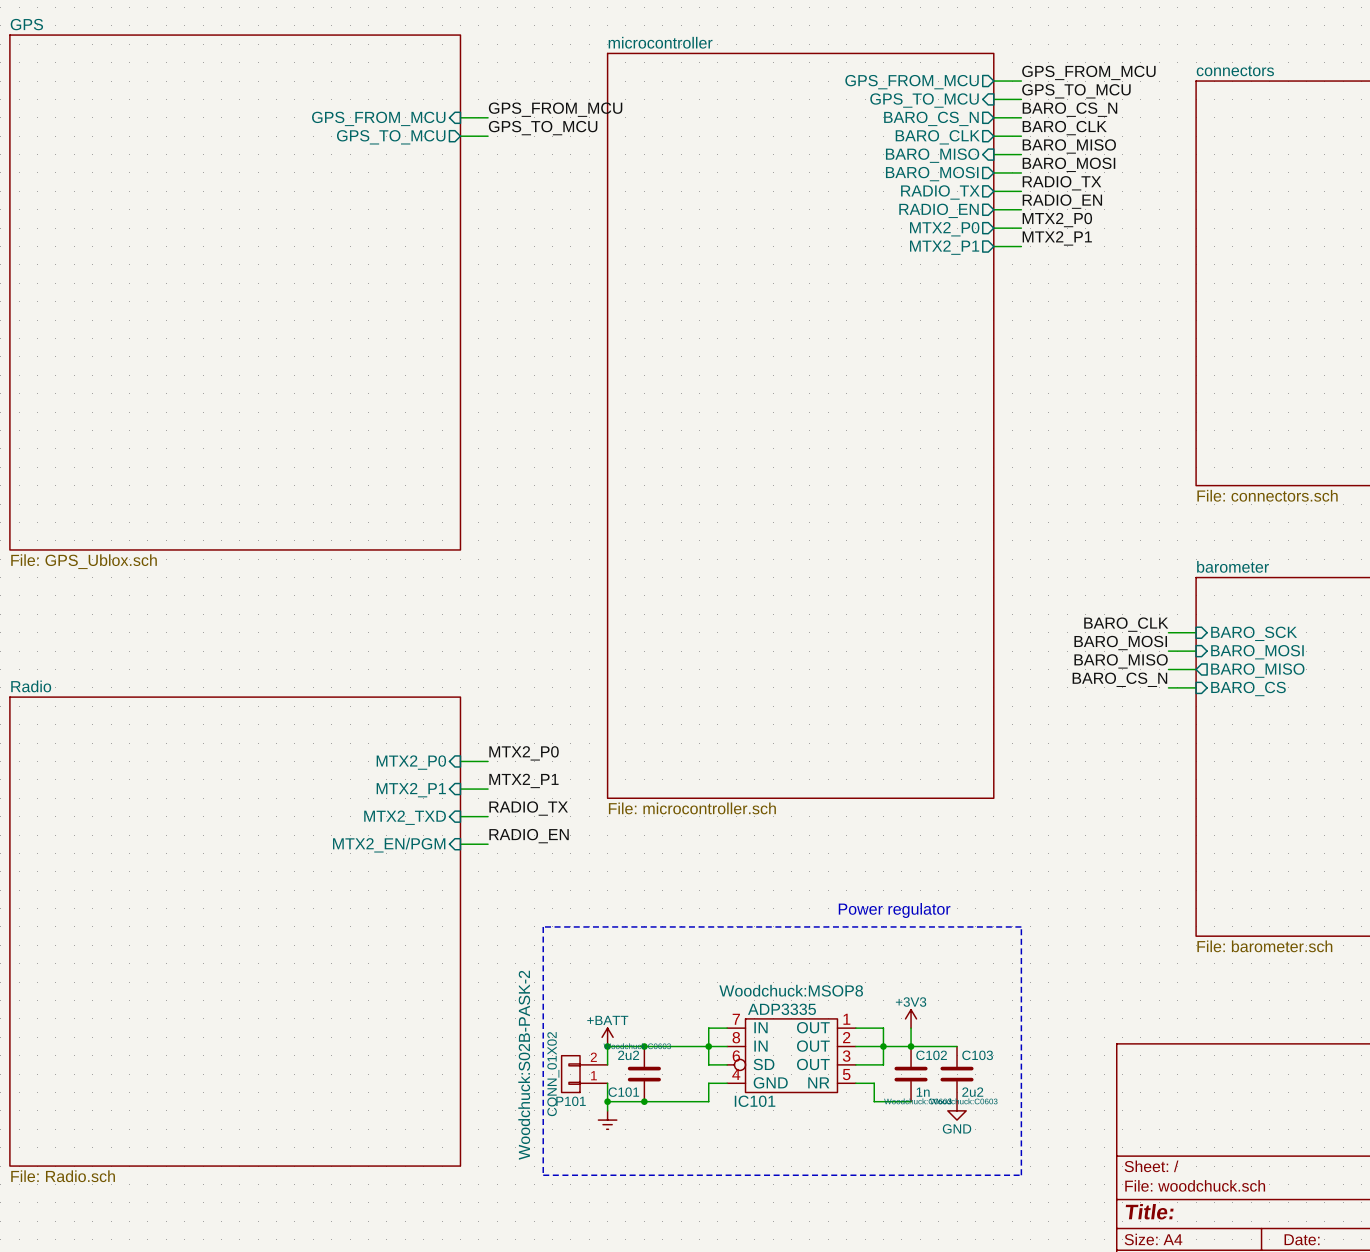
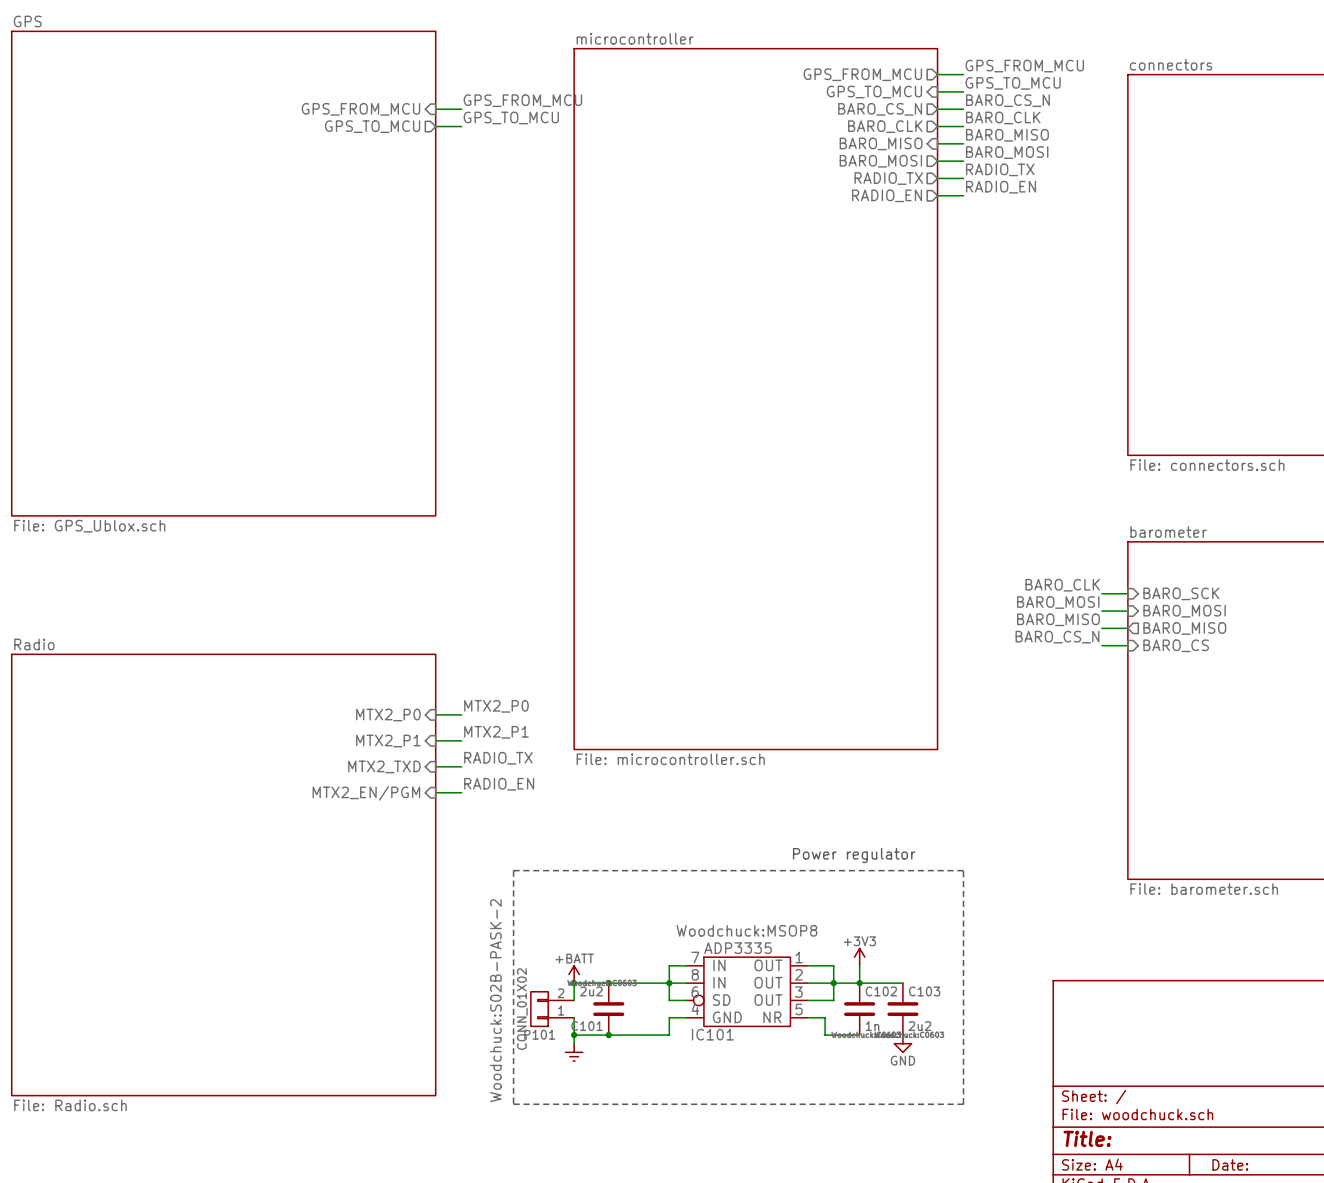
label: MTX2_P0 (1057, 220) -> none
wire: (993, 228) (1021, 228) -> none
sheet pin: MTX2_P0 (944, 229) -> none
label: MTX2_P1 (1057, 238) -> none
wire: (993, 246) (1021, 246) -> none
sheet pin: MTX2_P1 (944, 247) -> none

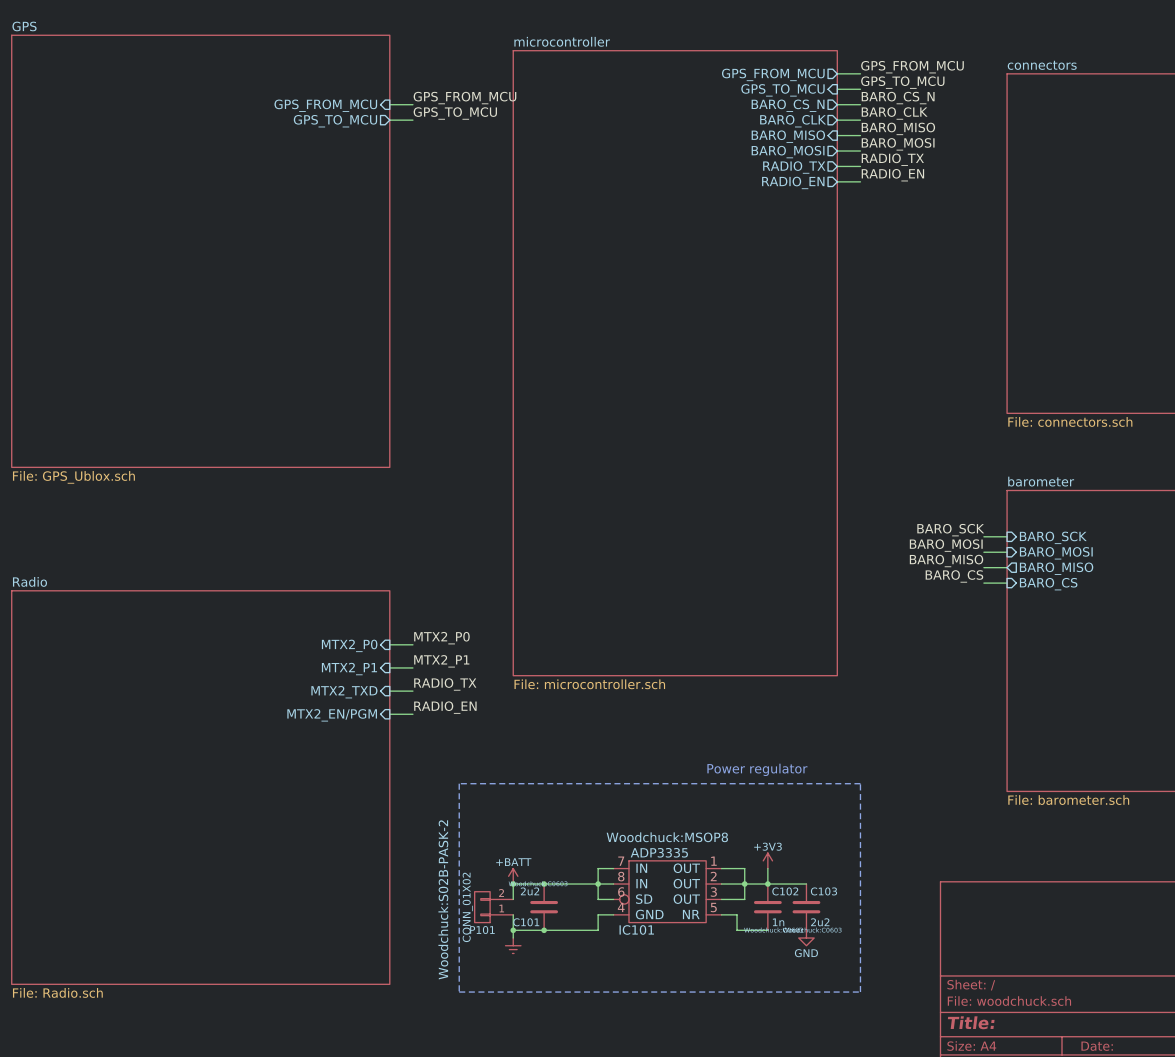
label: BARO_CLK (1062, 585) -> BARO_SCK (950, 530)
label: BARO_CS_N (1057, 637) -> BARO_CS (954, 576)

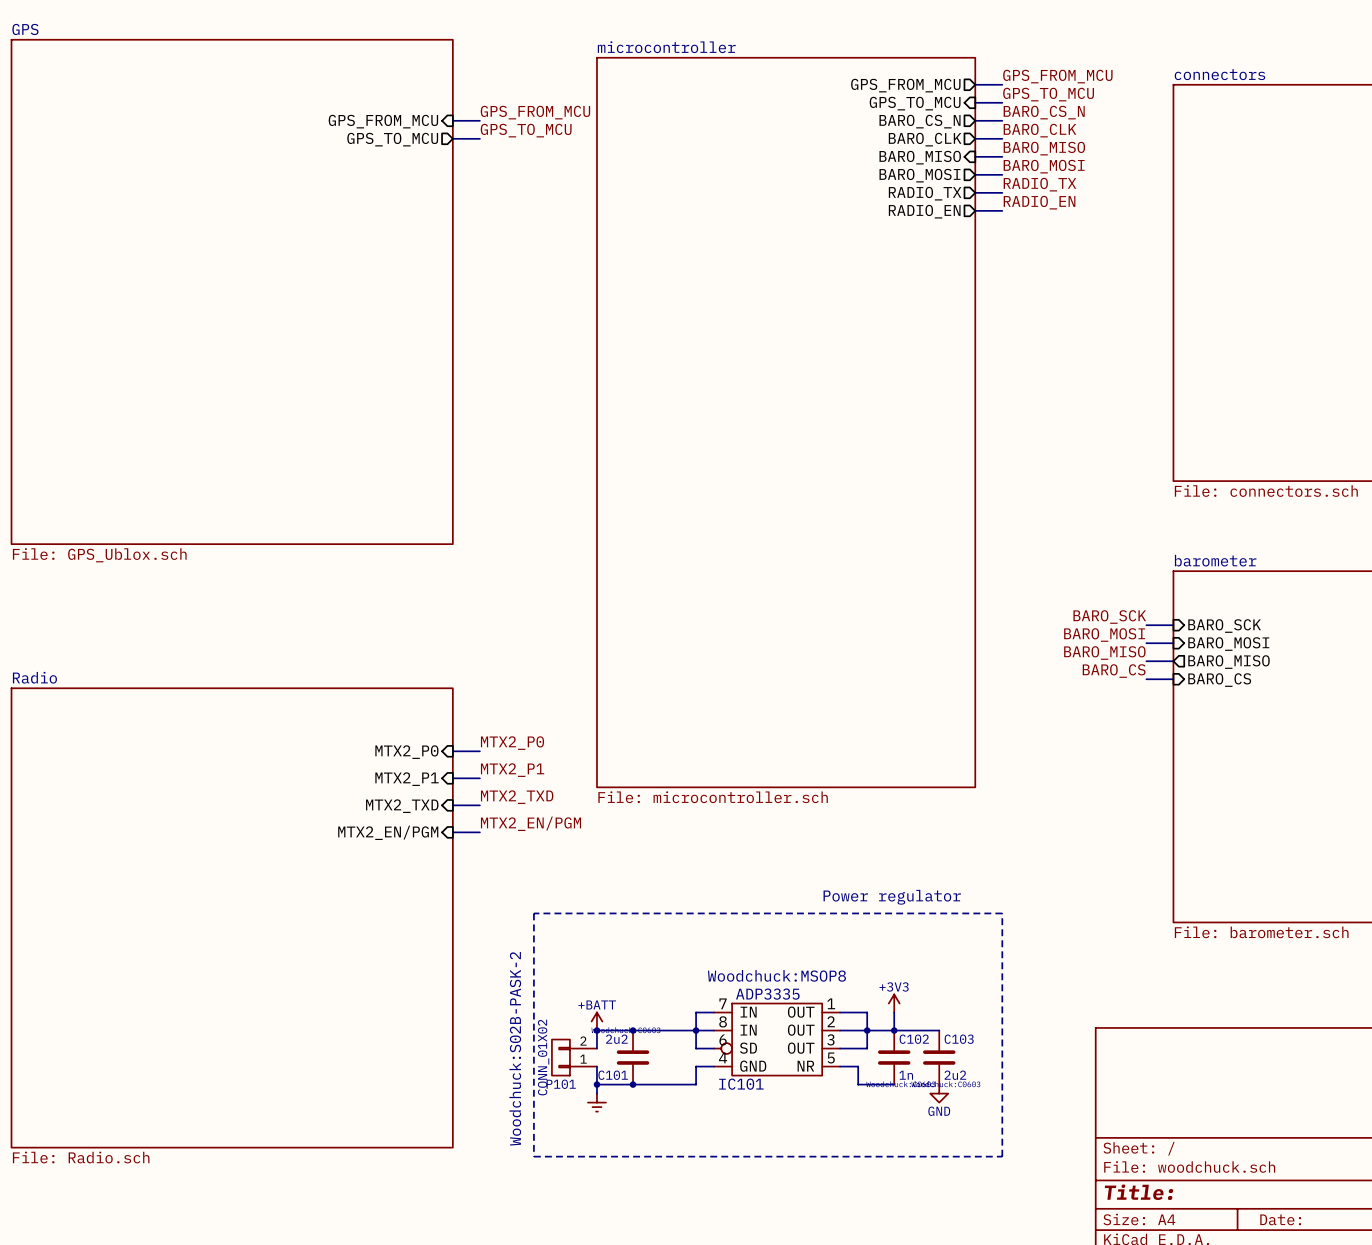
label: RADIO_TX (445, 684) -> MTX2_TXD (517, 797)
label: RADIO_EN (445, 707) -> MTX2_EN/PGM (530, 823)

